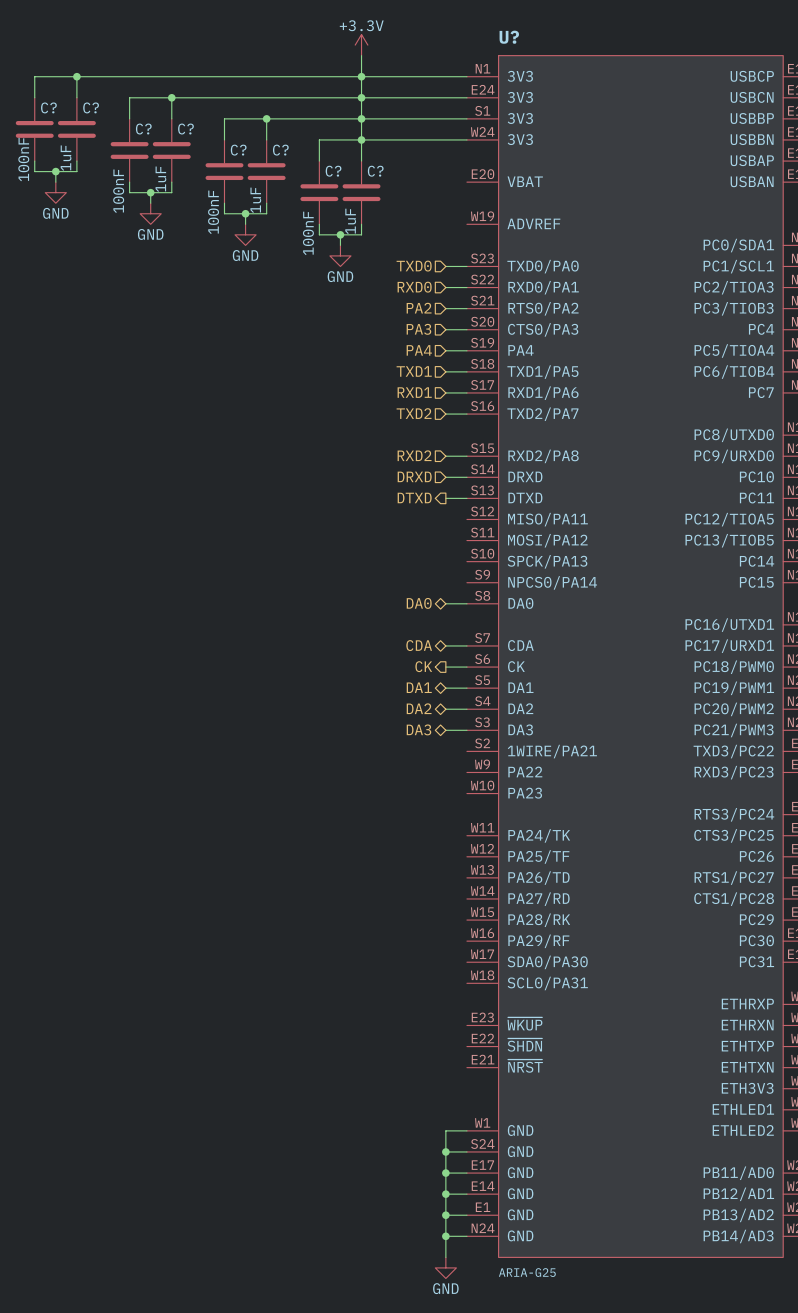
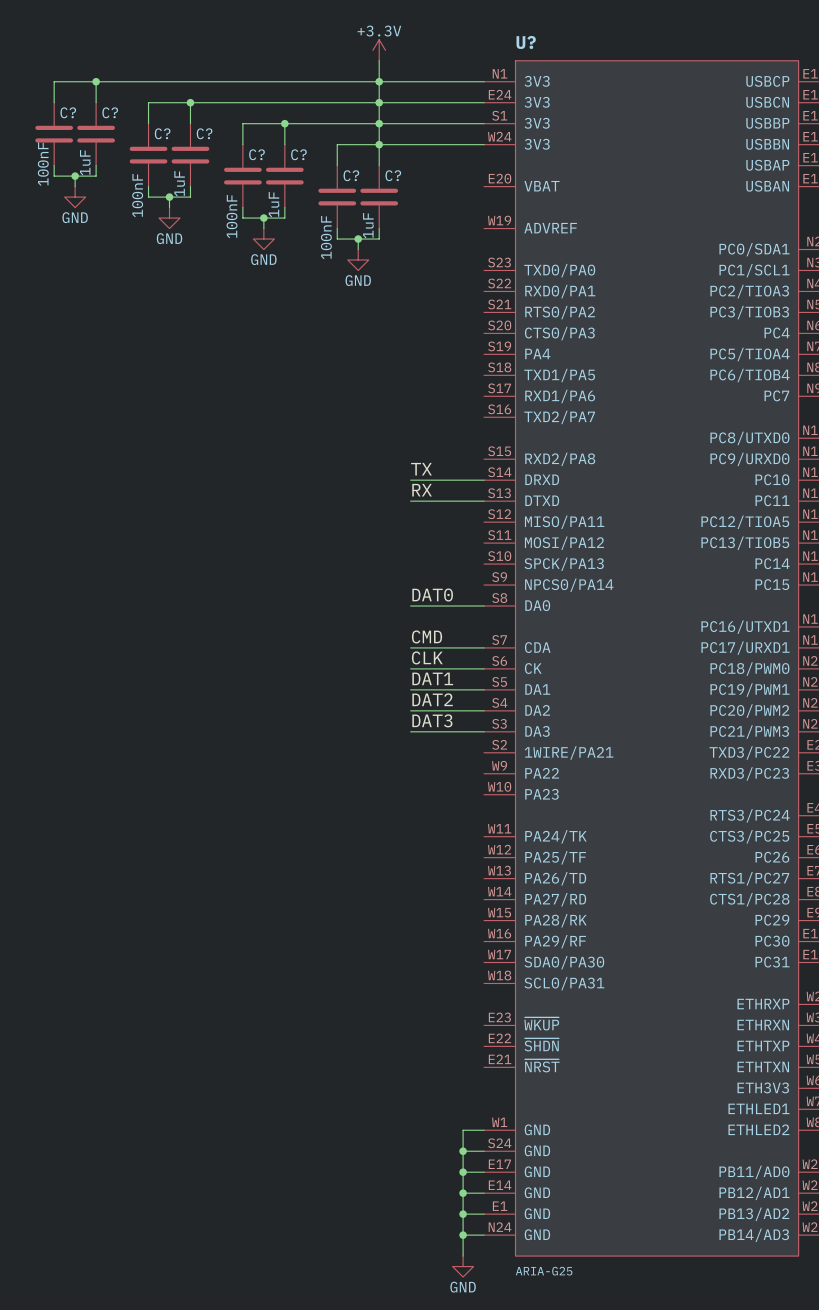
hierarchical label: TXD0 (414, 266) -> none
wire: (445, 266) (466, 266) -> none
hierarchical label: RXD0 (414, 287) -> none
wire: (445, 287) (466, 287) -> none
hierarchical label: PA2 (419, 308) -> none
wire: (445, 308) (466, 308) -> none
hierarchical label: PA3 (418, 329) -> none
wire: (445, 329) (466, 329) -> none
hierarchical label: PA4 (419, 350) -> none
wire: (445, 350) (466, 350) -> none
hierarchical label: TXD1 (414, 371) -> none
wire: (445, 371) (466, 371) -> none
hierarchical label: RXD1 (414, 392) -> none
wire: (445, 392) (466, 392) -> none
hierarchical label: TXD2 (414, 413) -> none
wire: (445, 414) (466, 414) -> none
hierarchical label: RXD2 (414, 455) -> none
wire: (445, 456) (466, 456) -> none
label: none -> TX (421, 469)
hierarchical label: DRXD (414, 476) -> none
wire: none -> (410, 480) (463, 480)
label: none -> RX (422, 490)
hierarchical label: DTXD (414, 497) -> none
wire: none -> (410, 501) (463, 501)
label: none -> DAT0 (432, 595)
wire: none -> (410, 606) (463, 606)
hierarchical label: DA0 (419, 603) -> none
label: none -> CMD (427, 636)
wire: none -> (410, 647) (463, 647)
hierarchical label: CDA (419, 645) -> none
label: none -> CLK (427, 657)
hierarchical label: CK (423, 666) -> none
wire: none -> (410, 668) (463, 668)
label: none -> DAT1 (432, 678)
hierarchical label: DA1 (419, 687) -> none
wire: none -> (410, 689) (463, 689)
label: none -> DAT2 (432, 699)
hierarchical label: DA2 (419, 708) -> none
wire: none -> (410, 710) (463, 710)
label: none -> DAT3 (432, 720)
hierarchical label: DA3 (418, 729) -> none
wire: none -> (410, 731) (463, 731)

